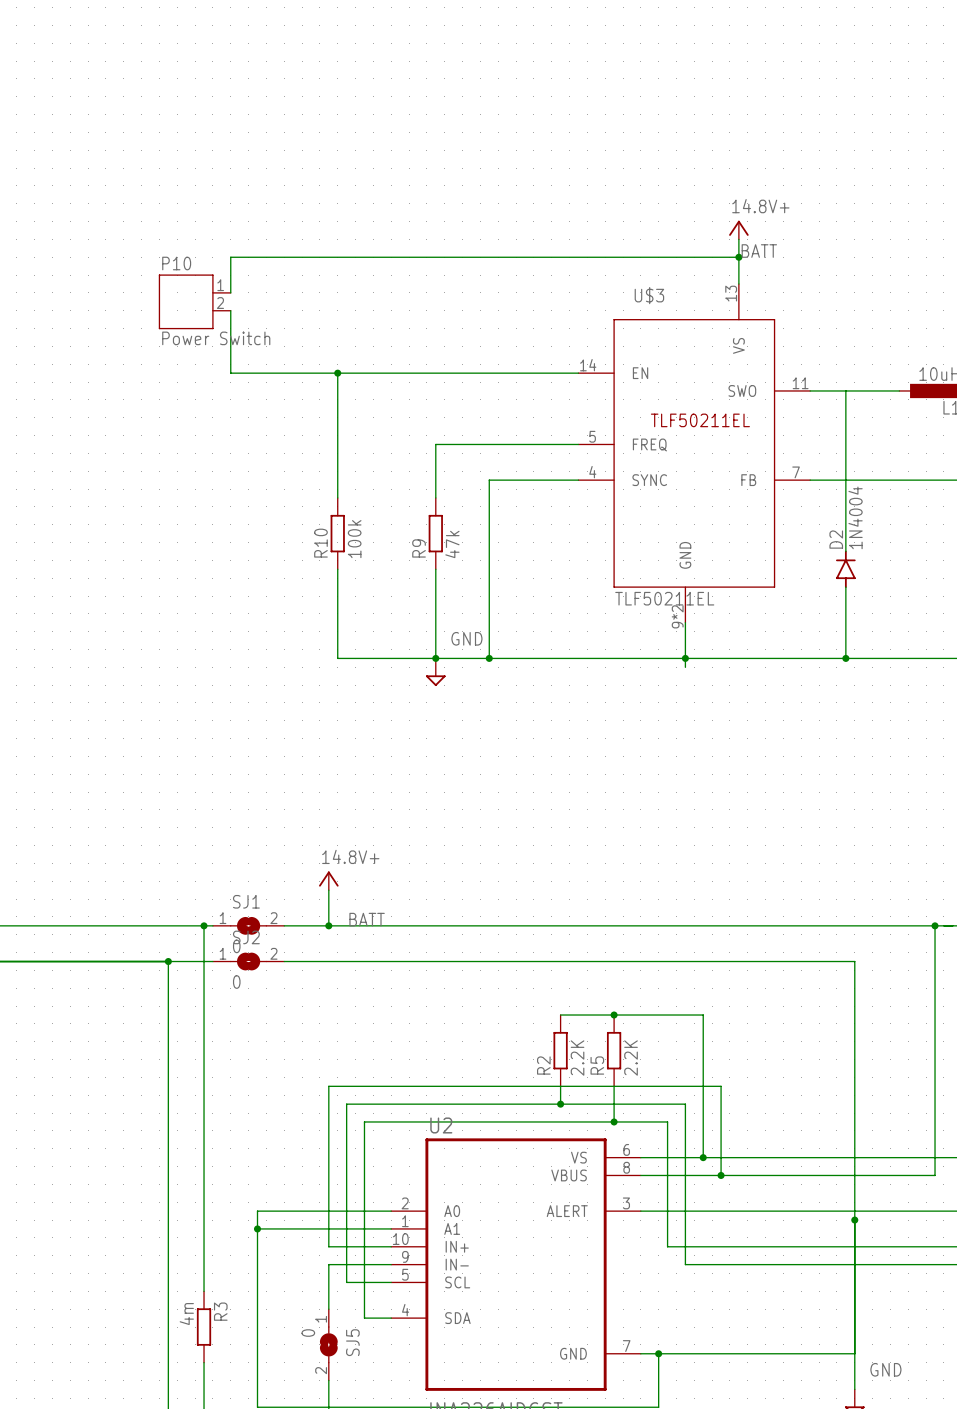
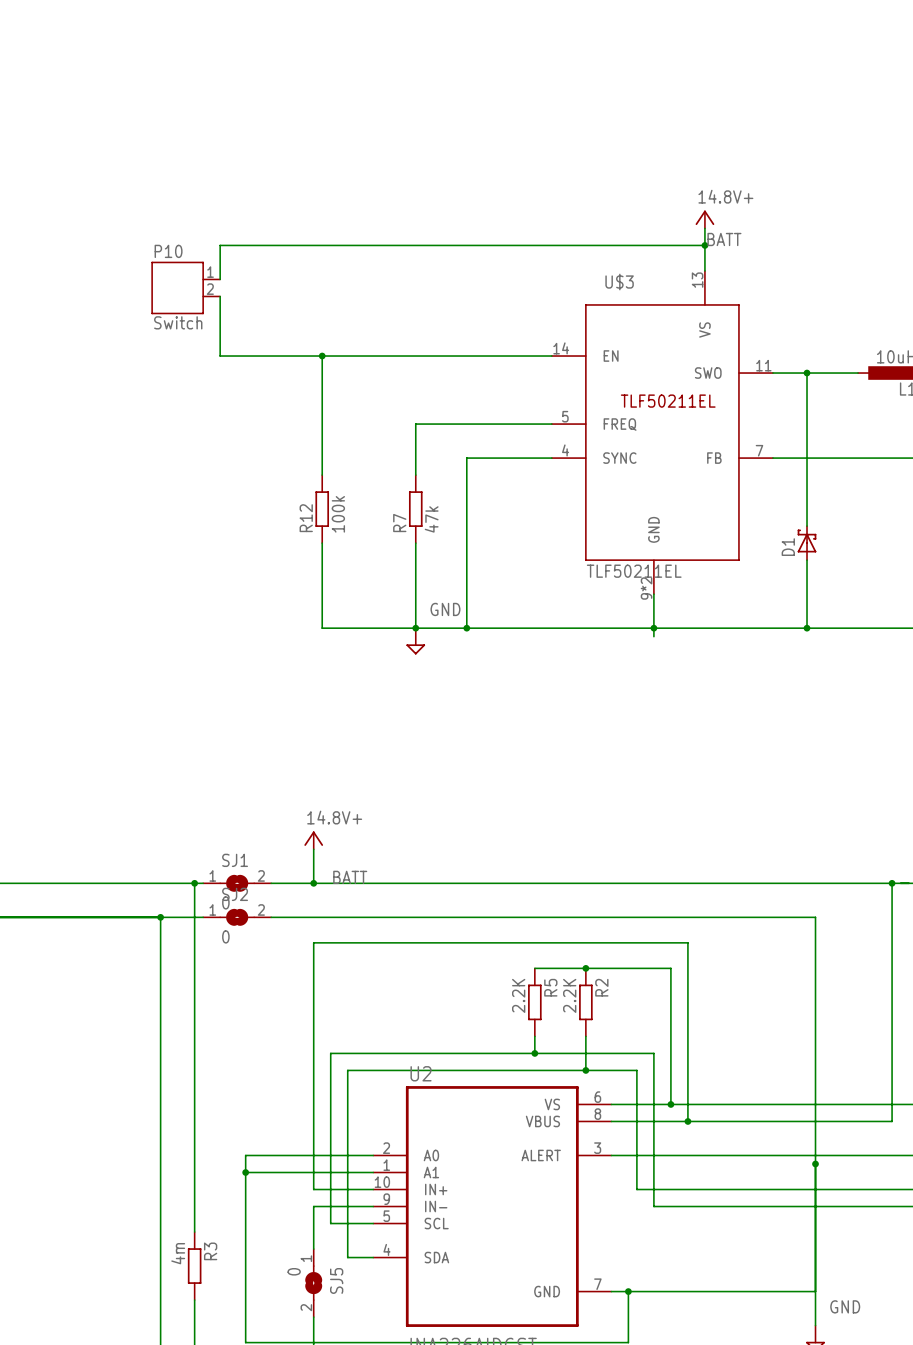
P10 value: Power Switch (216, 338) -> Switch (178, 322)
junction: none -> (807, 373)
R10 name: R10 (320, 543) -> R12 (306, 518)
R9 name: R9 (419, 548) -> R7 (399, 523)
D2: 1N4004 (845, 569) -> none
D1: none -> (807, 543)
R2 value position: 2.2K (577, 1058) -> 2.2K (518, 995)
R5 value position: 2.2K (631, 1058) -> 2.2K (569, 995)
R2 name: R2 (543, 1065) -> R5 (550, 987)
R5 name: R5 (597, 1065) -> R2 (601, 987)
wire: (328, 1086) (721, 1086) -> (313, 1036) (313, 942) (687, 942) (687, 1036)

